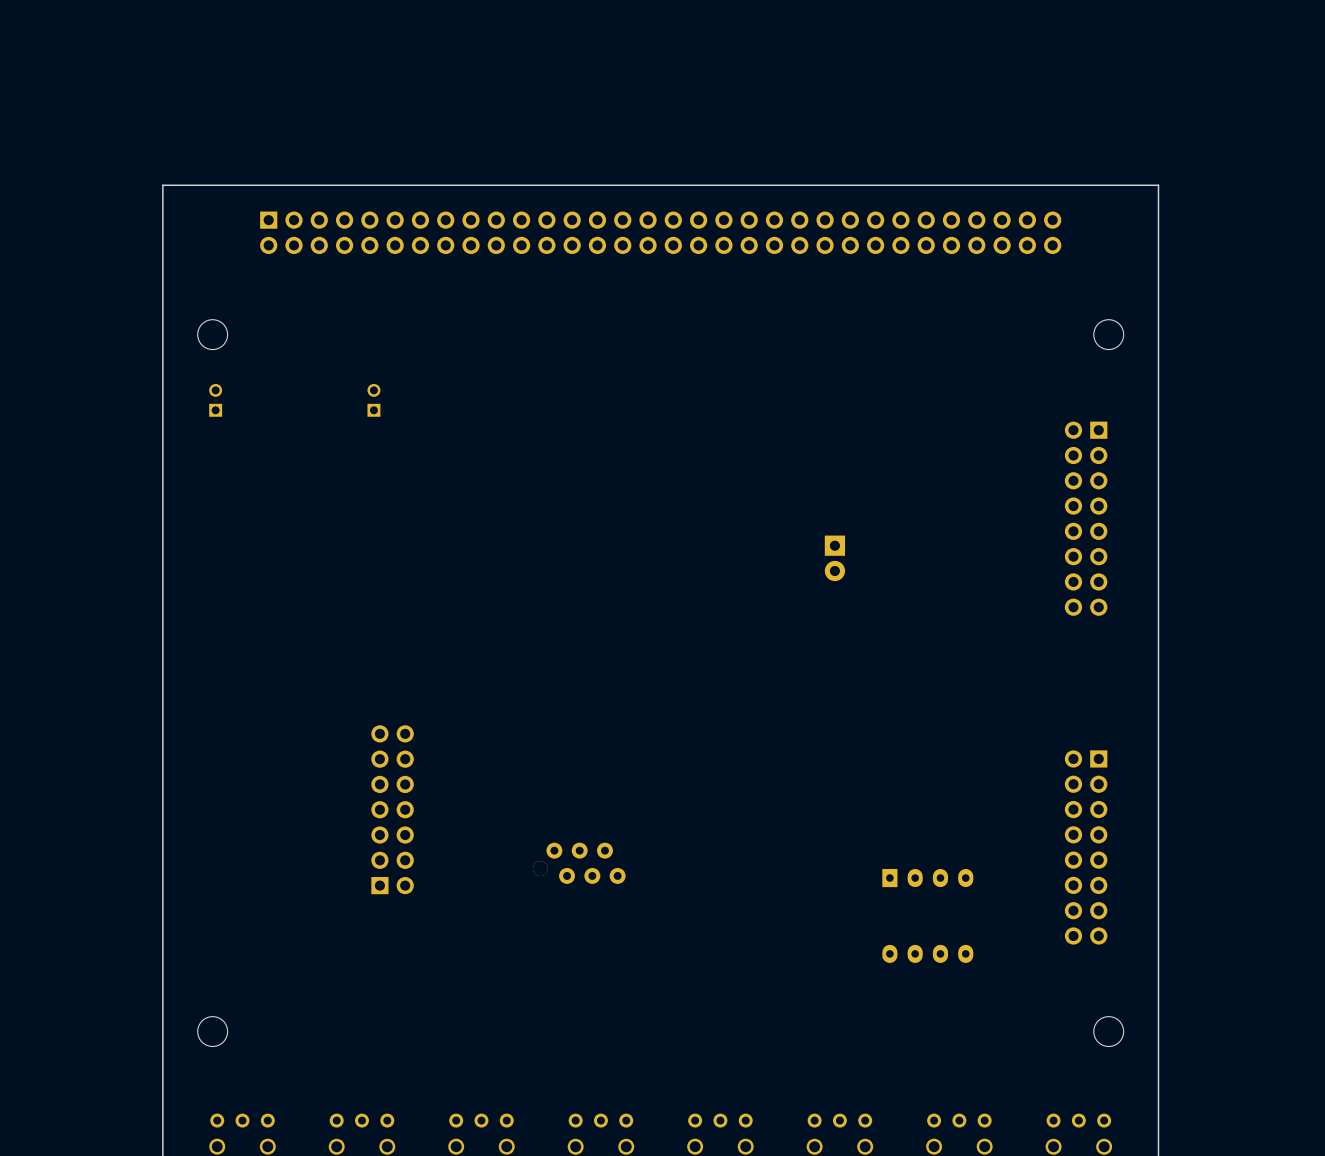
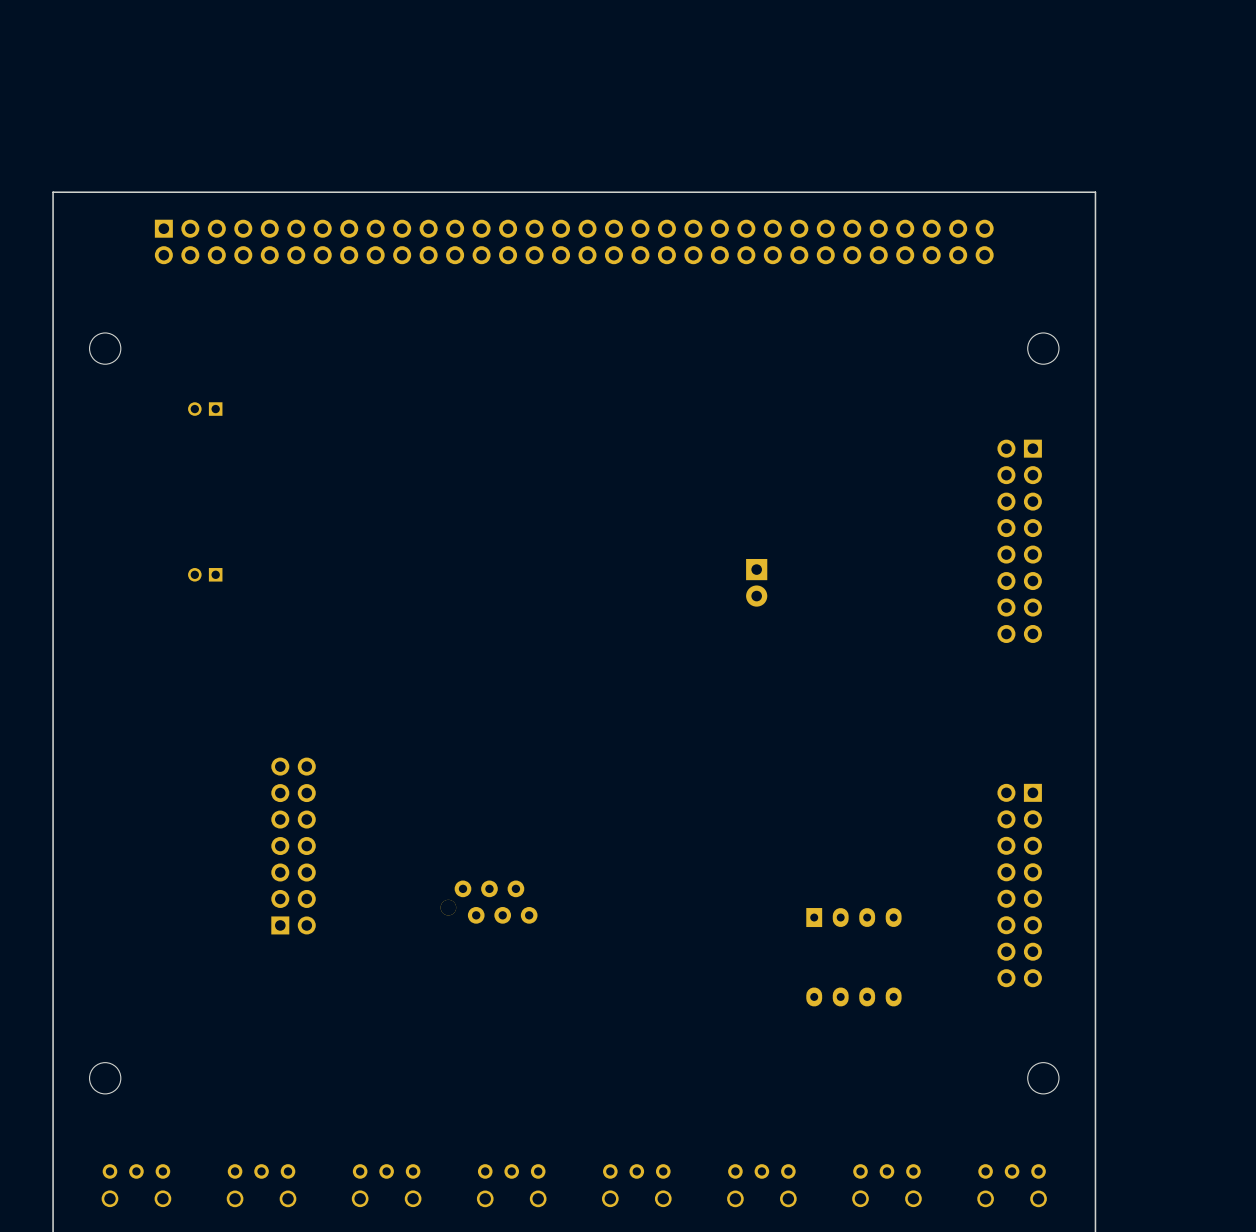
part: none -> (205, 409)
part: (215, 400) -> none
part: (373, 400) -> none
part: none -> (205, 574)

